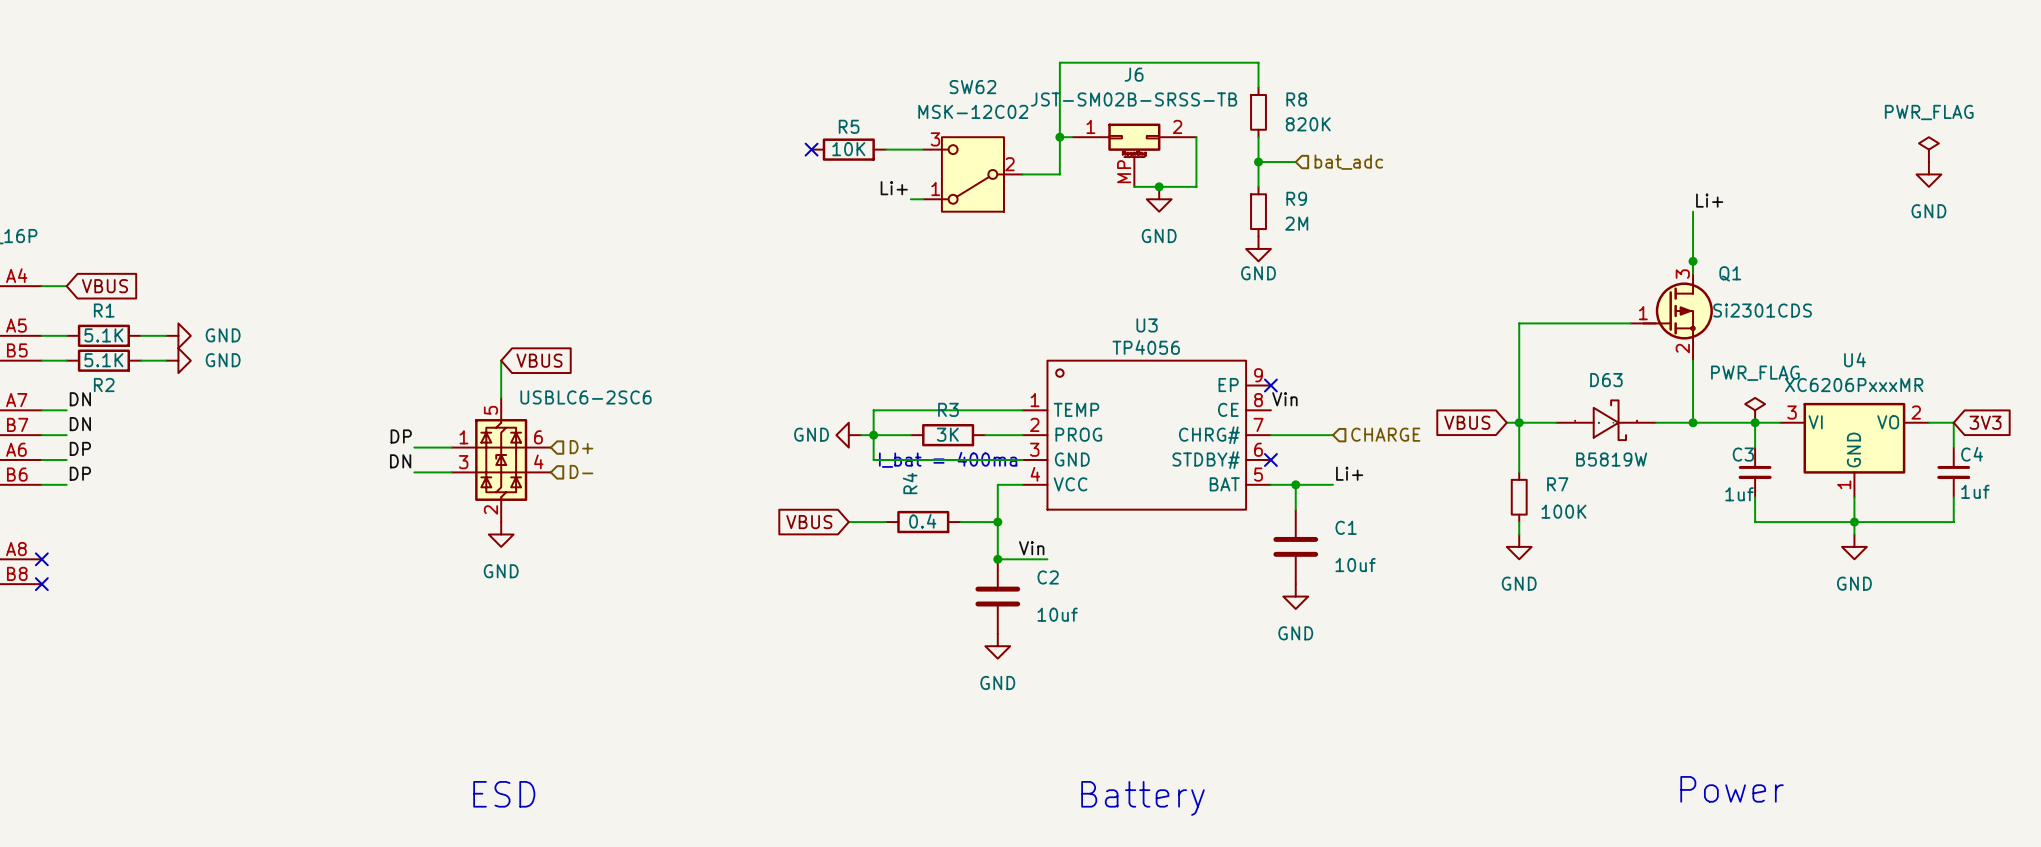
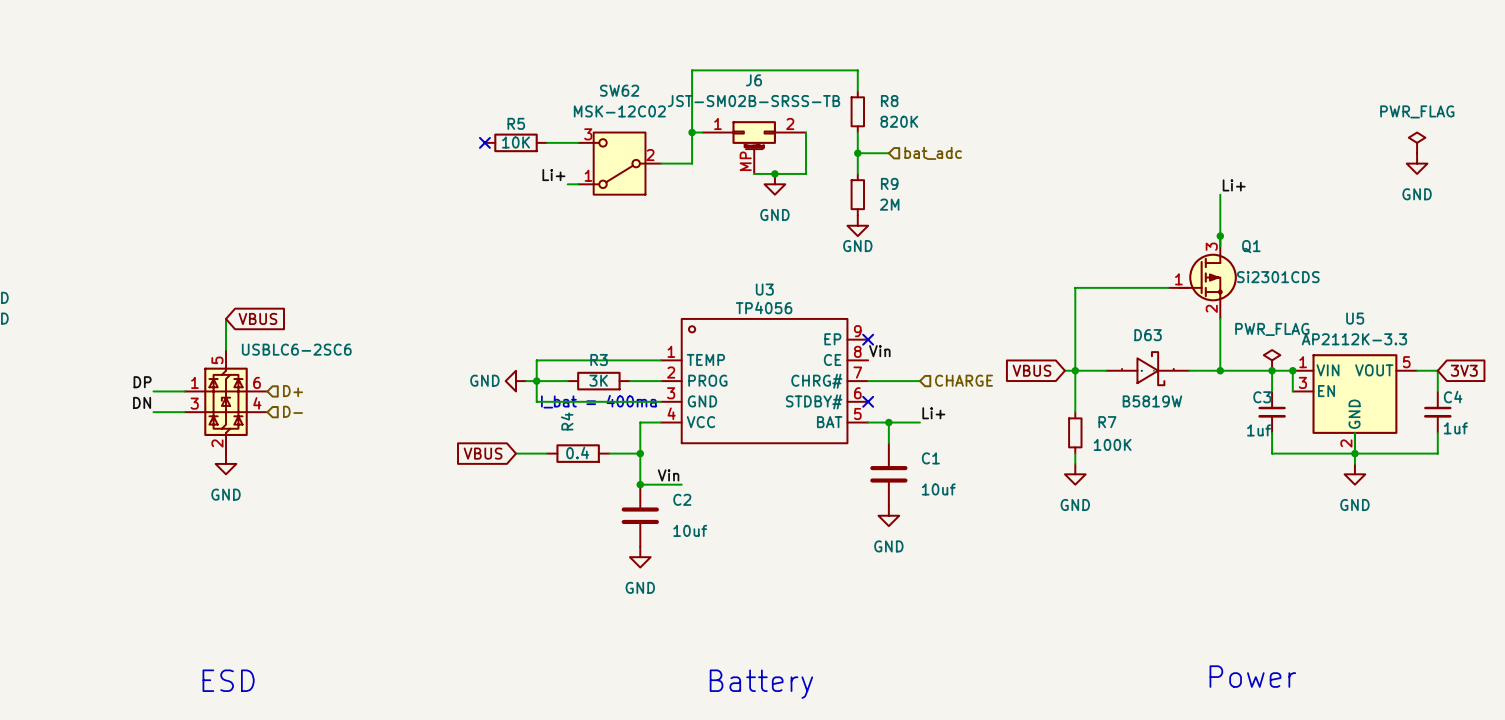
wire: none -> (1292, 370) (1292, 391)
junction: none -> (1292, 370)
U4: XC6206PxxxMR (1854, 450) -> none
U5: none -> AP2112K-3.3 (1354, 403)

